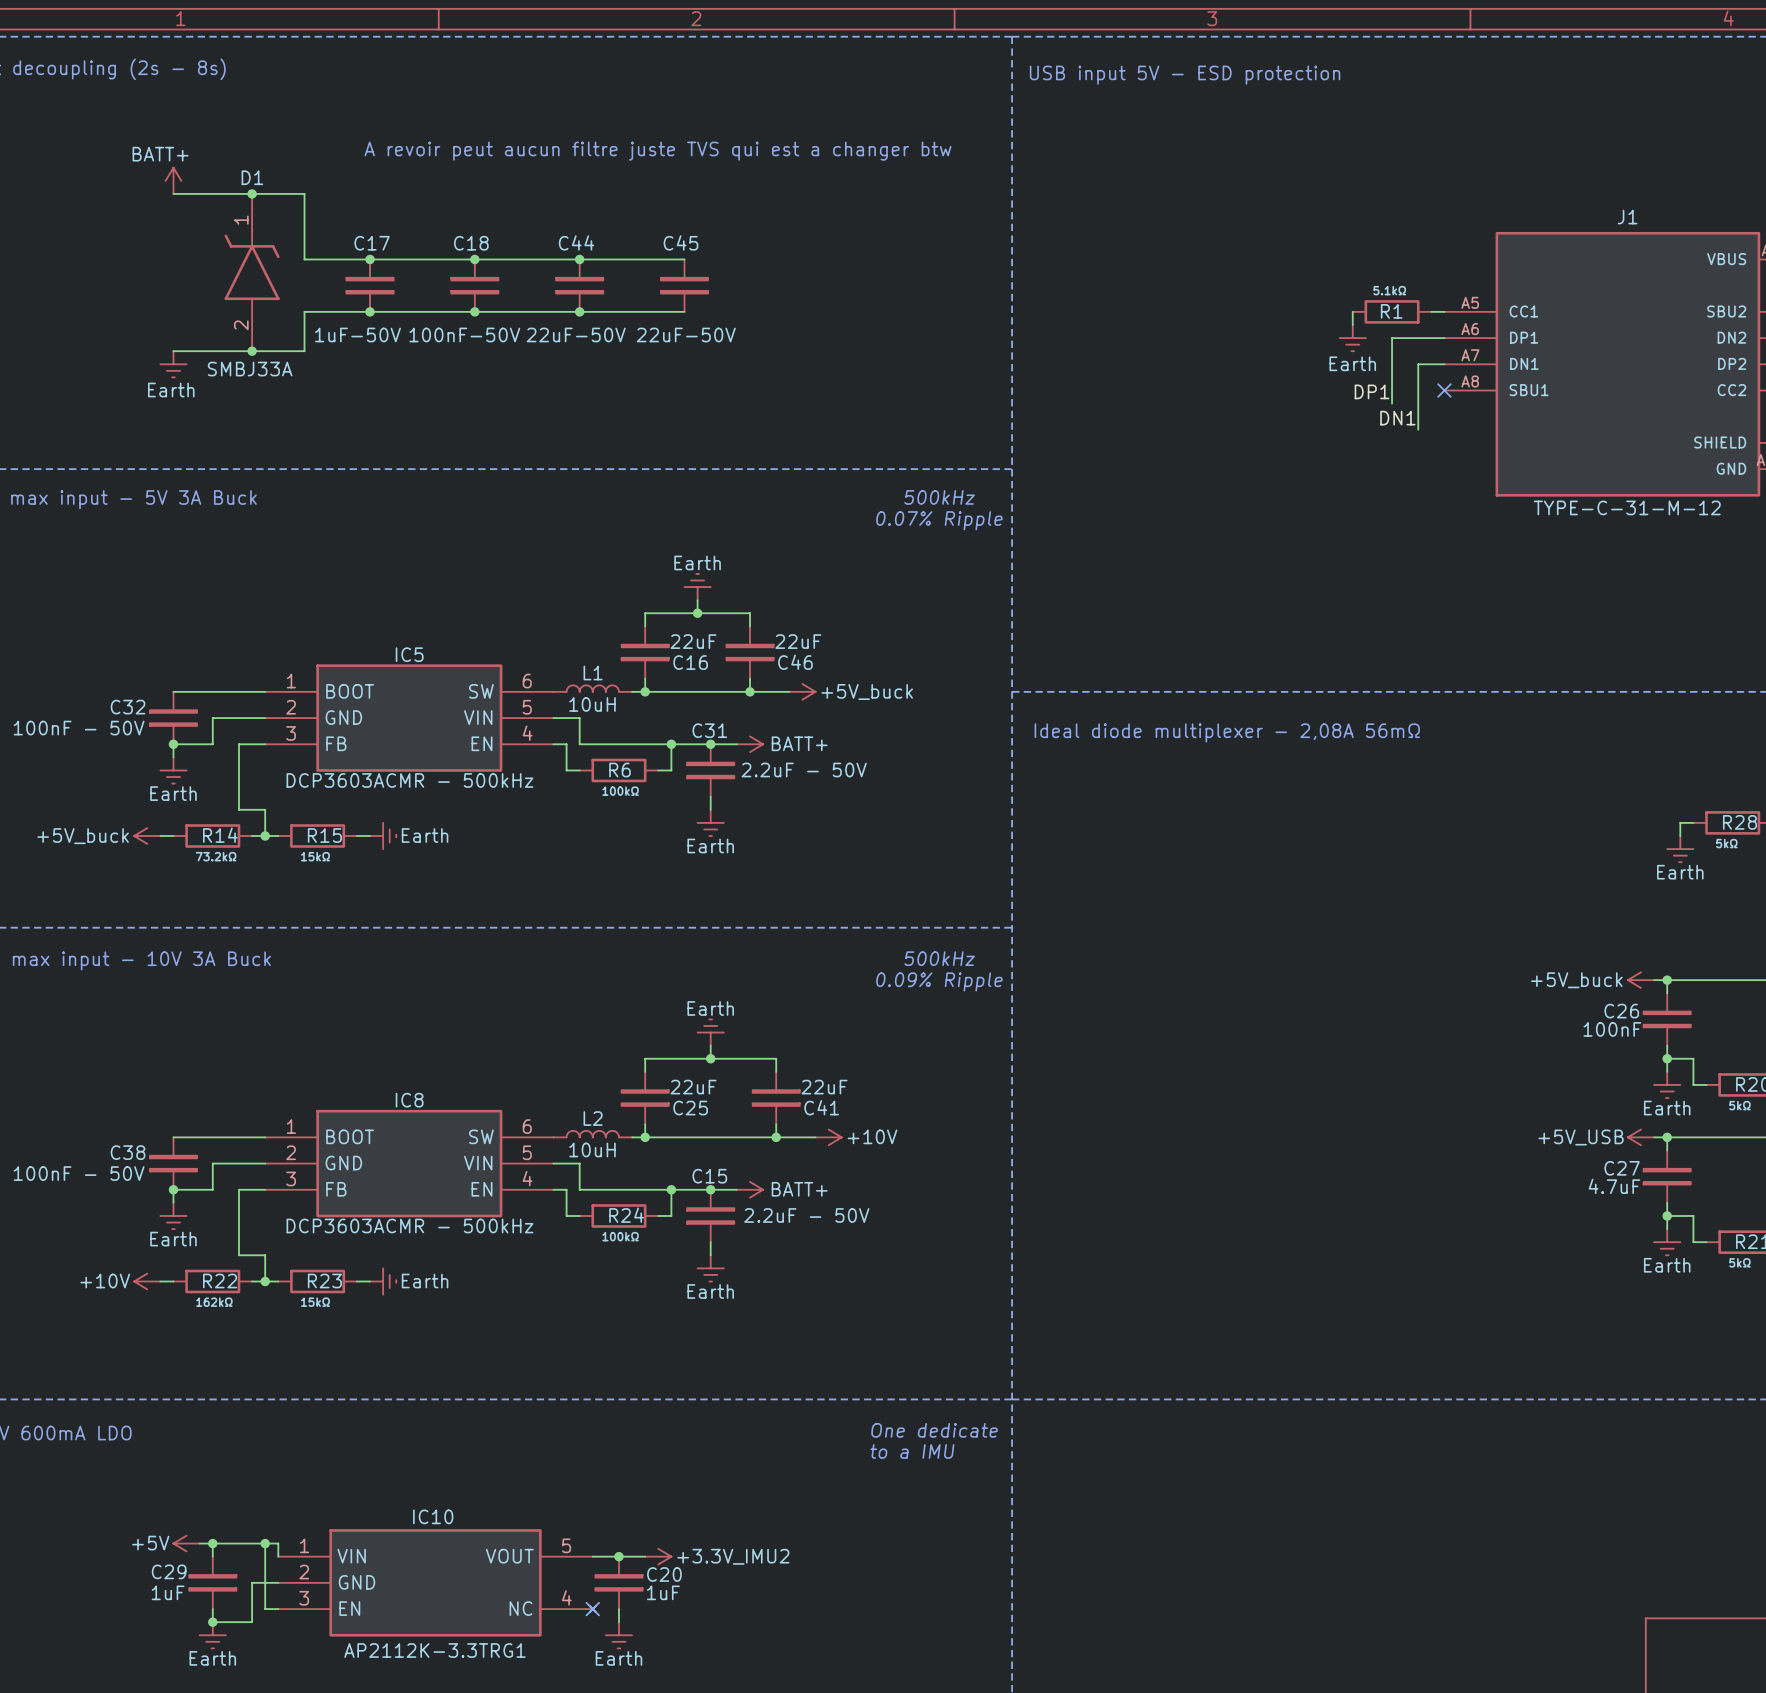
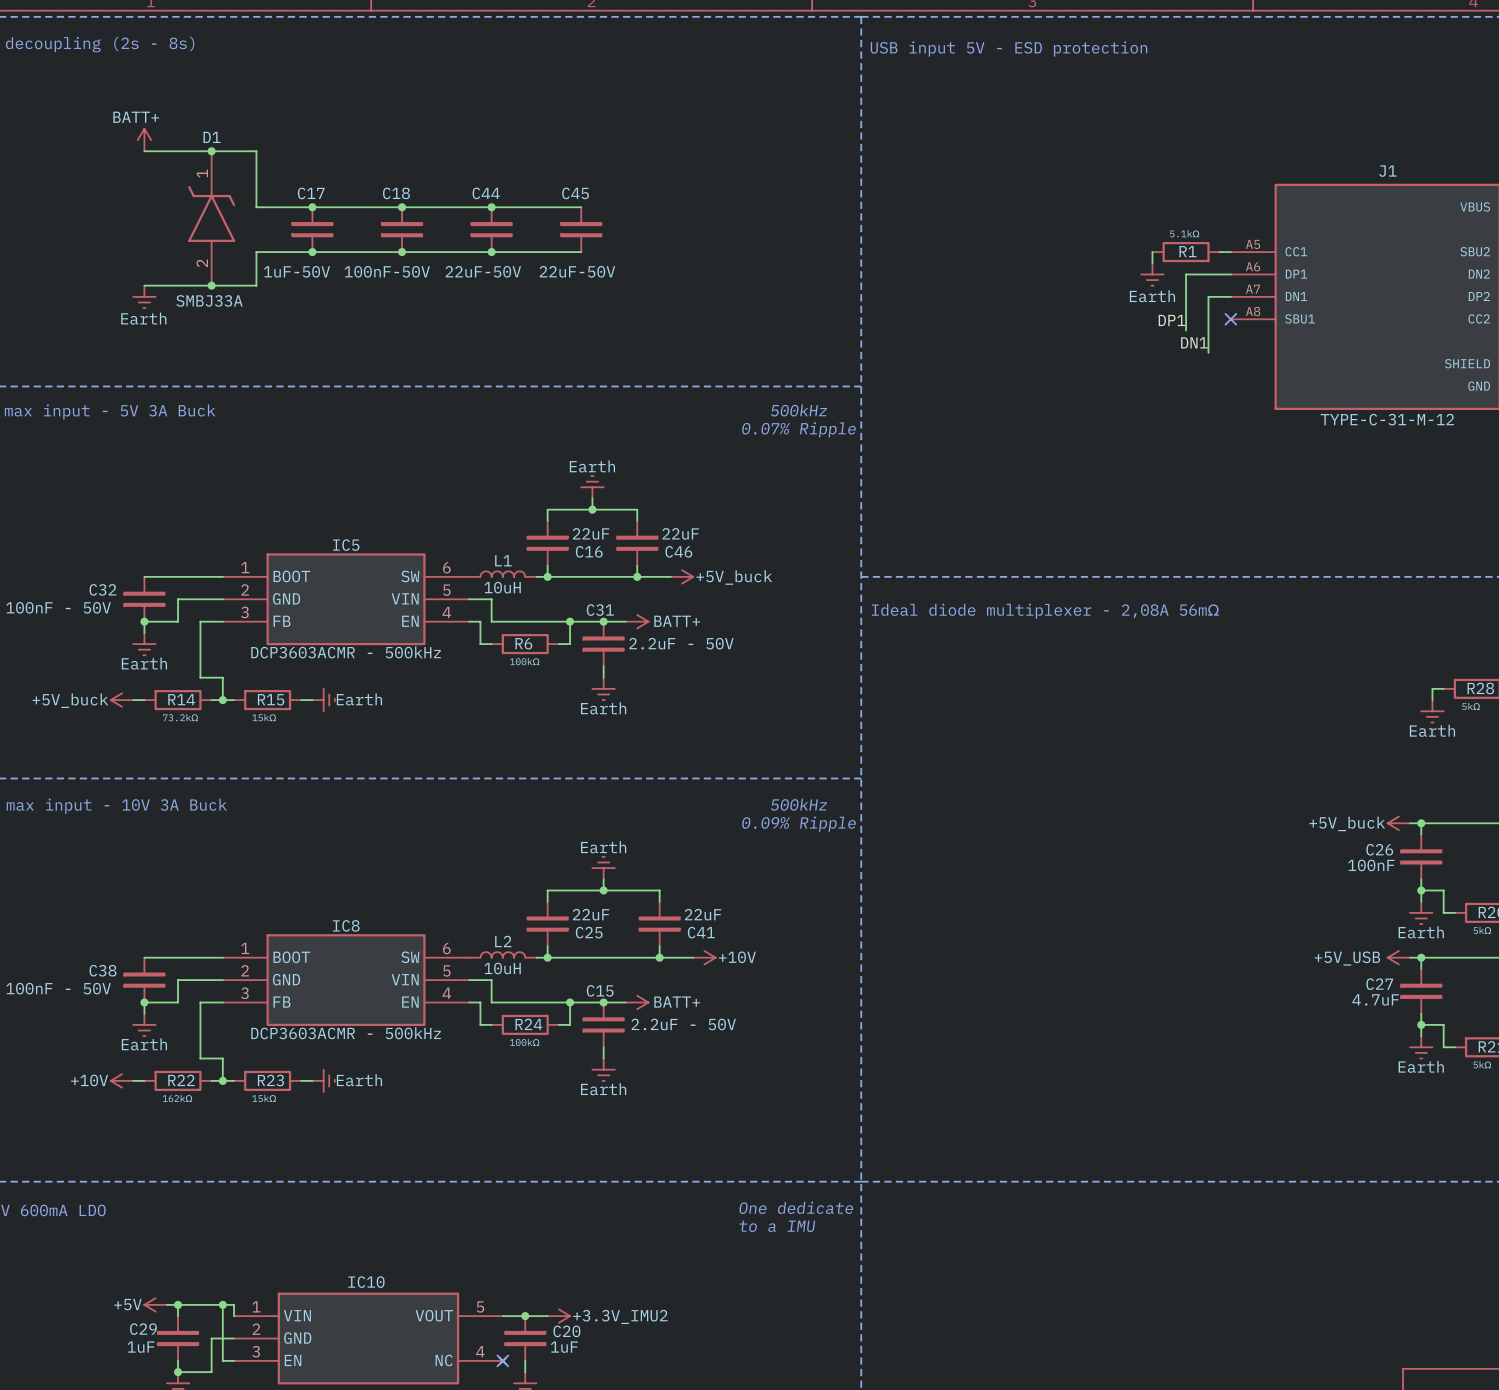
text: A revoir peut aucun filtre juste TVS qui est a changer btw (657, 151) -> none

